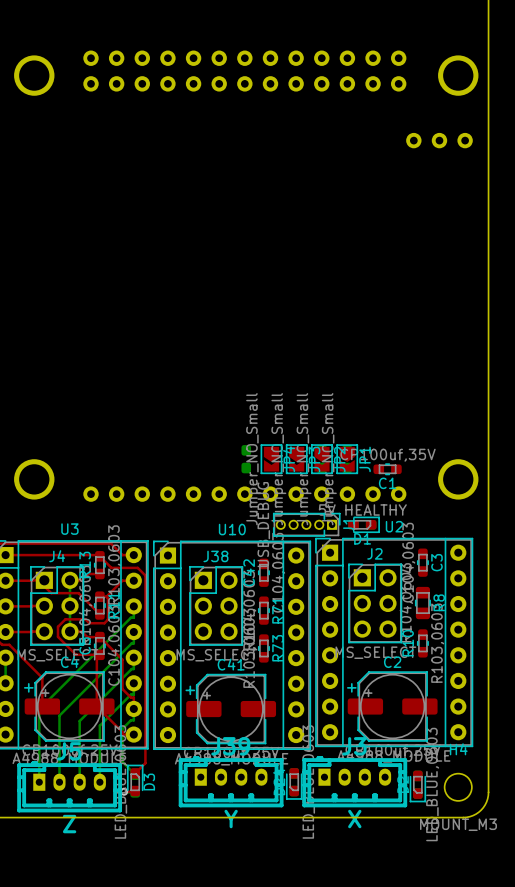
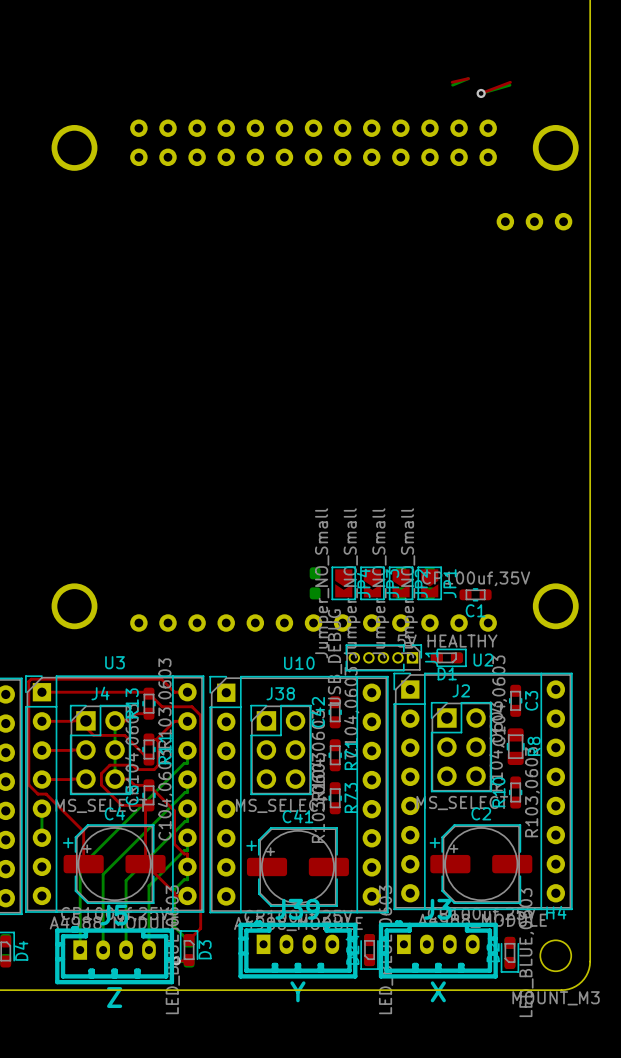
top track: none -> (468, 78) (452, 82)
bottom track: none -> (468, 78) (452, 85)
top track: none -> (510, 82) (481, 93)
bottom track: none -> (509, 85) (481, 93)
via: none -> (481, 93)

